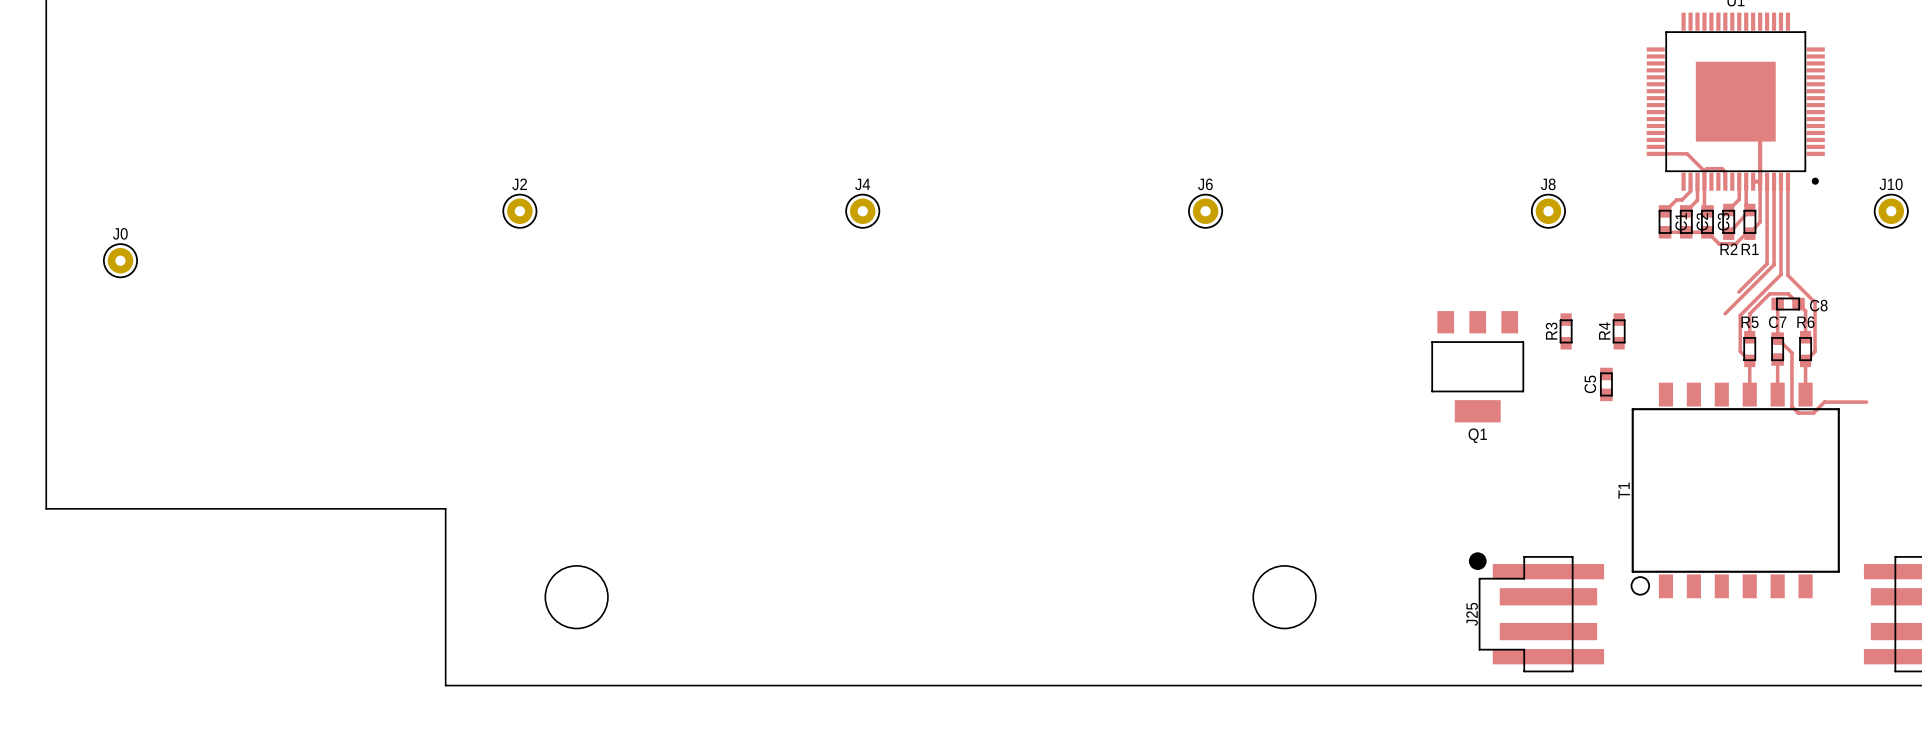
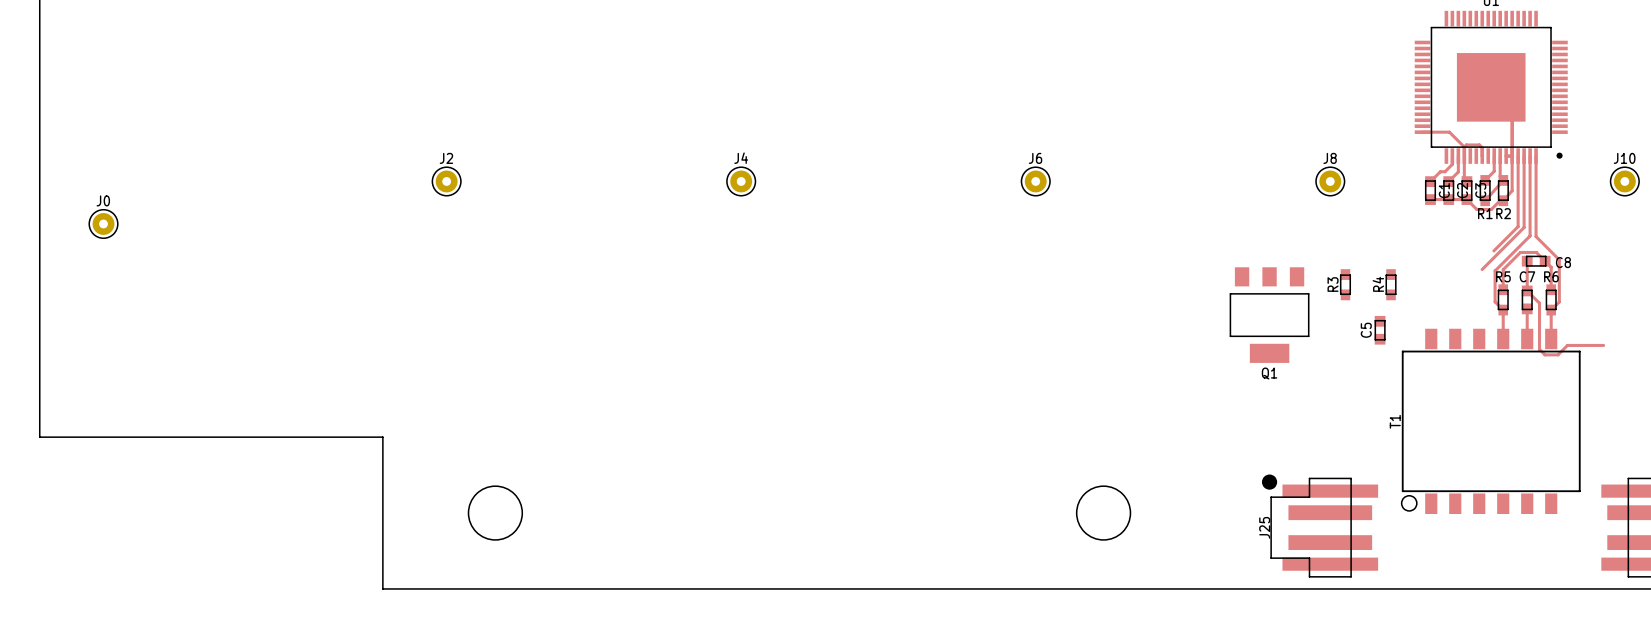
R2 name: R2 (1728, 249) -> R1 (1485, 213)
R1 name: R1 (1750, 249) -> R2 (1503, 213)

